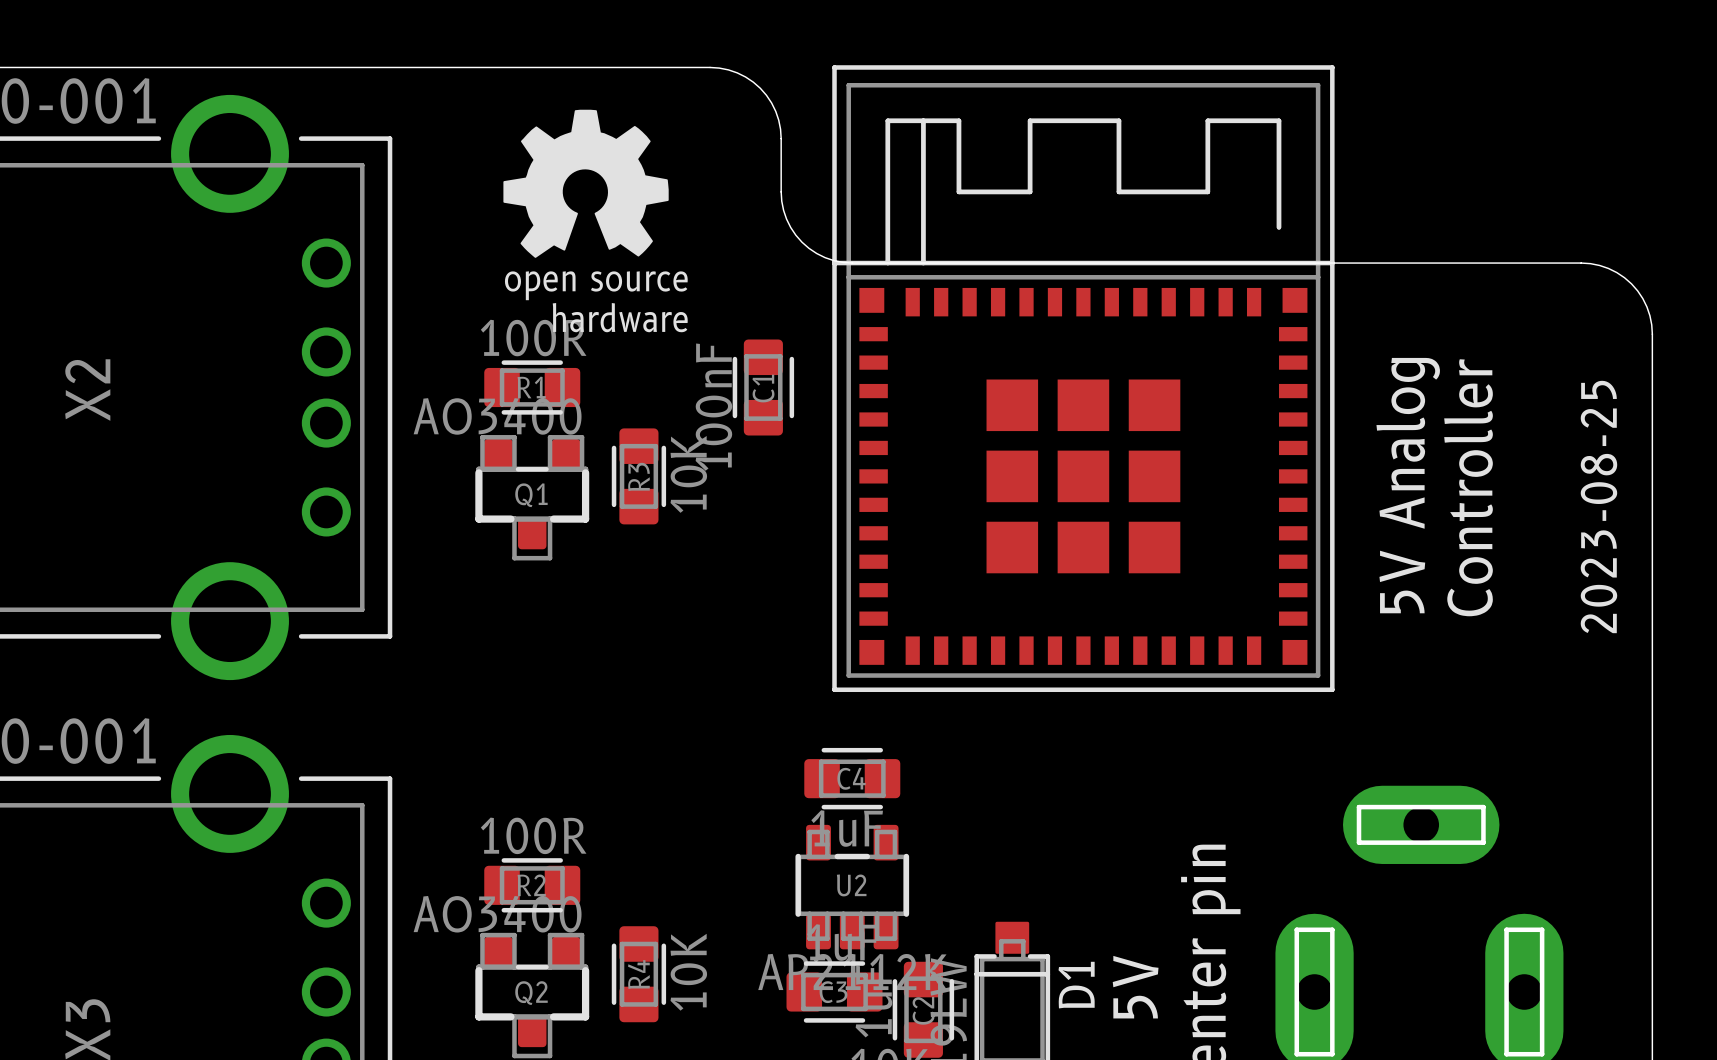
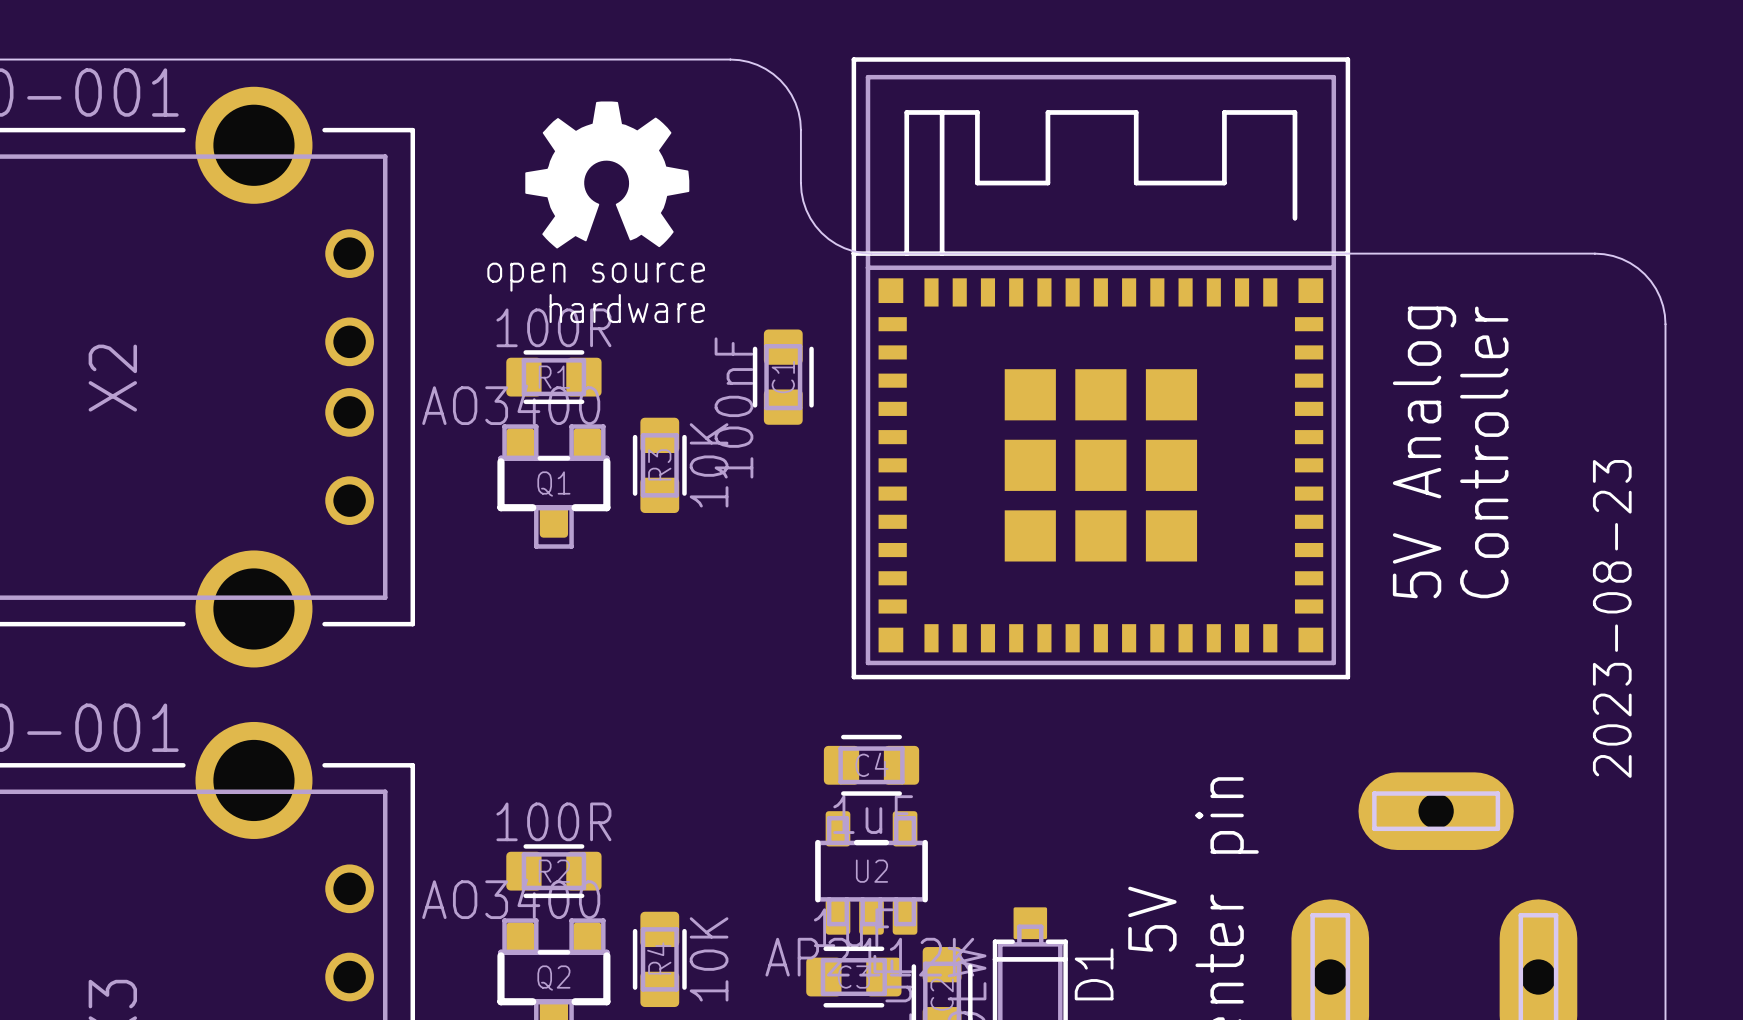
text: 2023-08-25 (1598, 506) -> 2023-08-23 (1612, 618)

